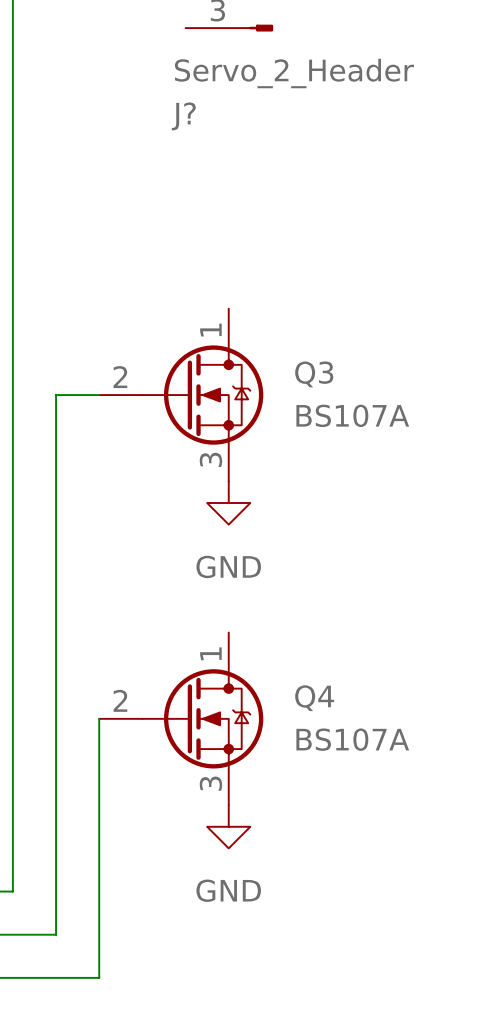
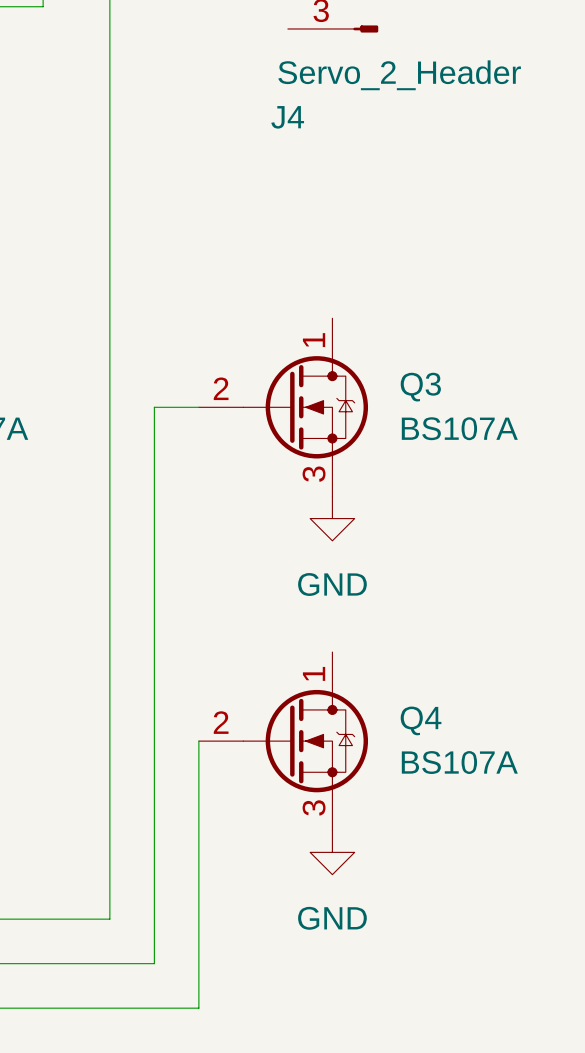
J? name: J? (183, 116) -> J4 (287, 117)

